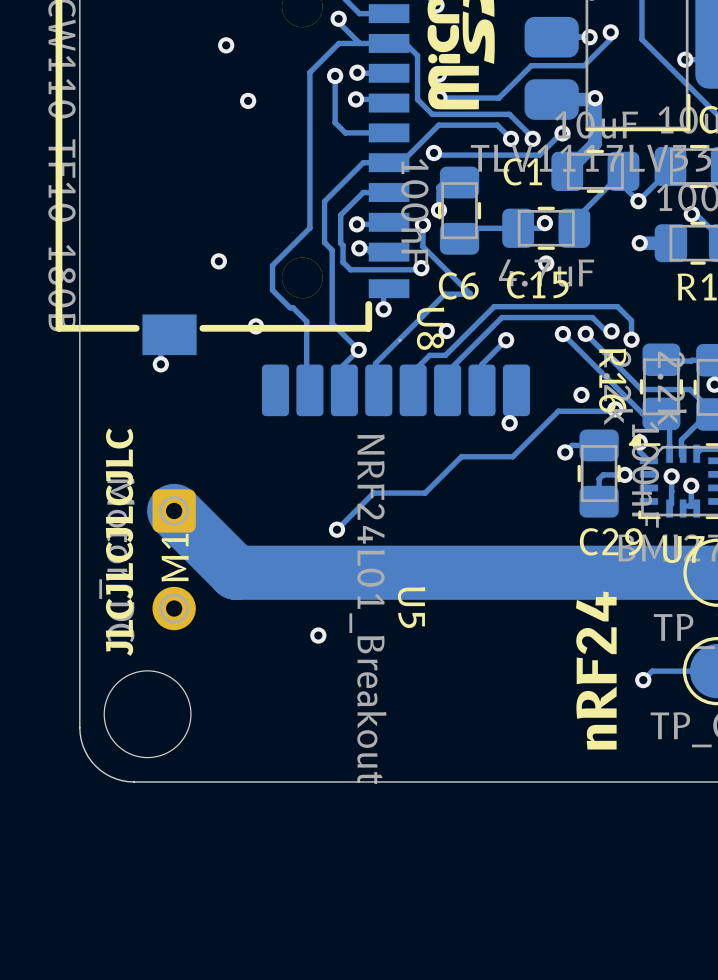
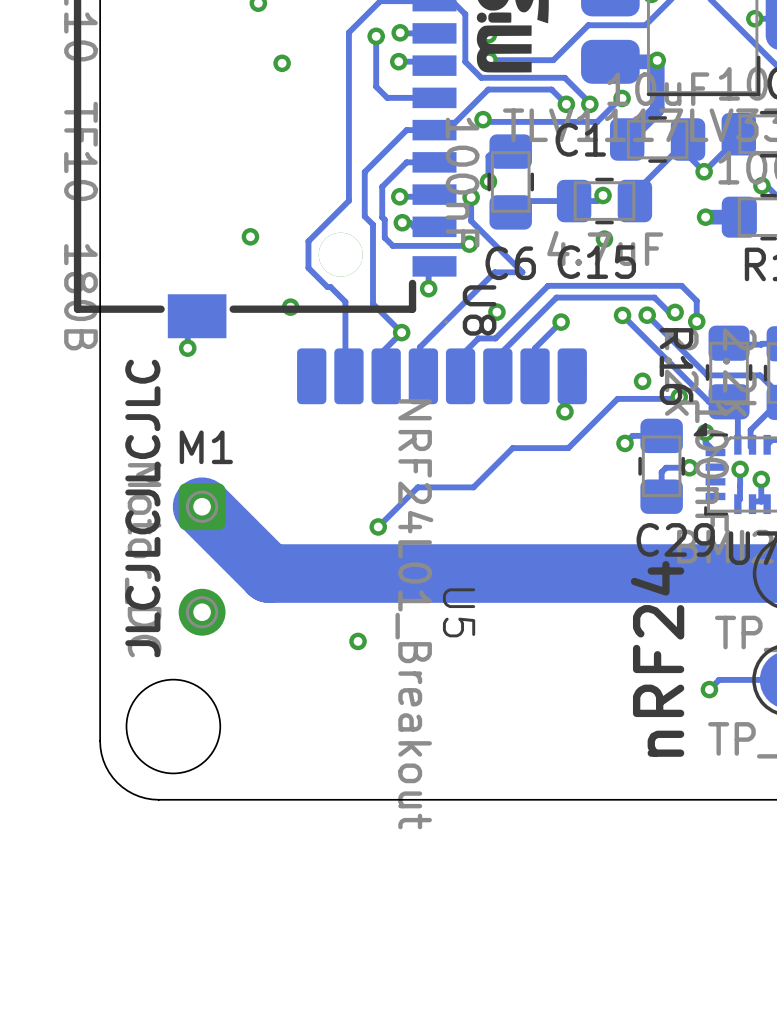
M1 name rotation: 0° (175, 557) -> 90° clockwise (206, 447)
M1 name position: M1 (175, 557) -> M1 (206, 447)

